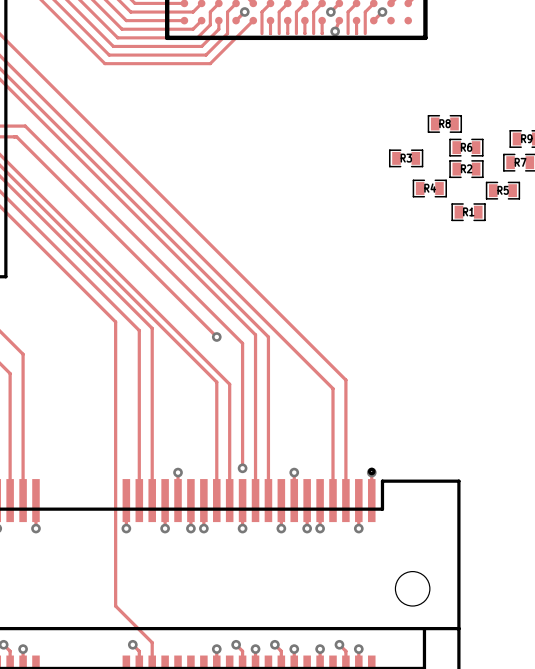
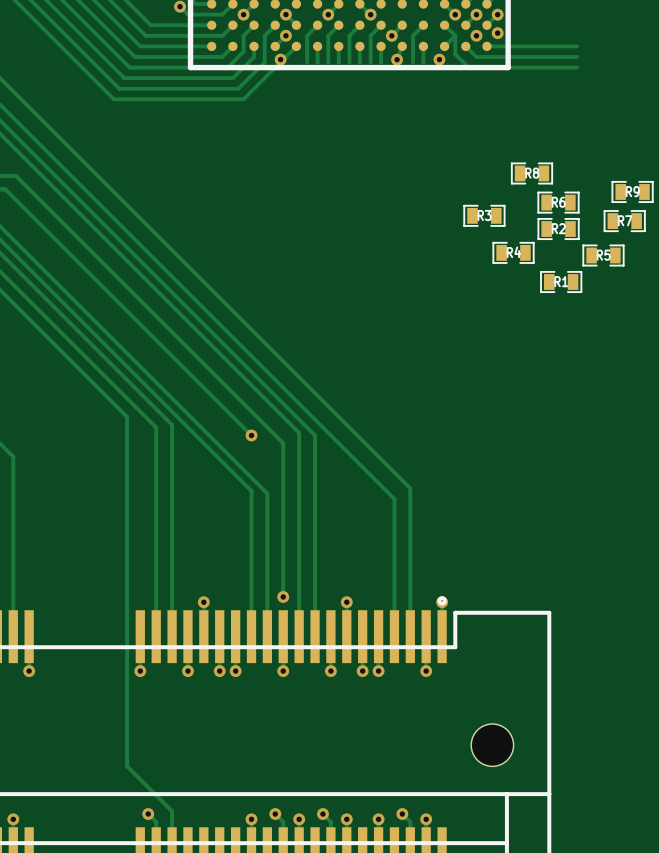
track: (373, 3) (365, 12) (365, 33) -> (444, 25) (455, 35) (455, 54) (468, 67) (577, 67)
via: none -> (497, 33)
via: none -> (476, 35)
via: (382, 12) -> none
track: none -> (465, 46) (476, 56) (577, 56)
track: none -> (486, 46) (577, 46)
via: none -> (280, 59)
via: none -> (439, 59)

